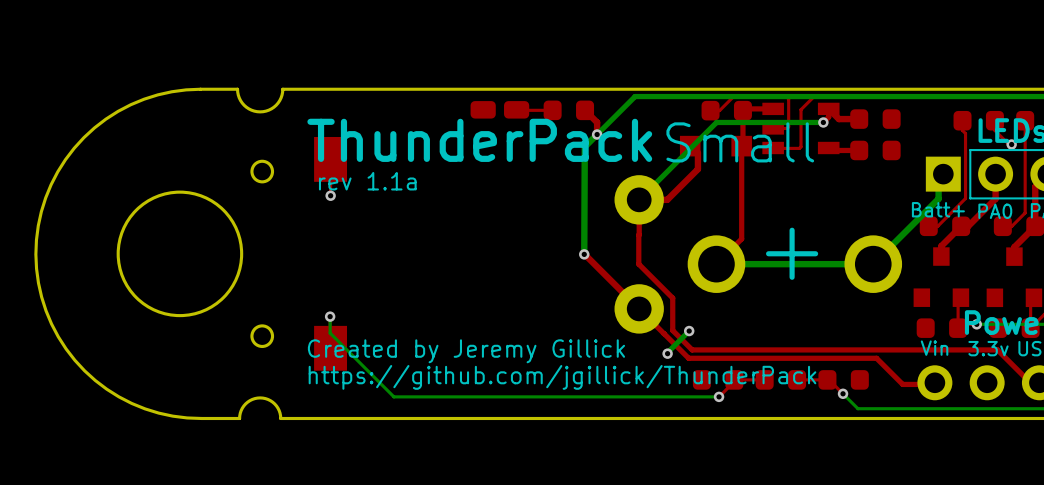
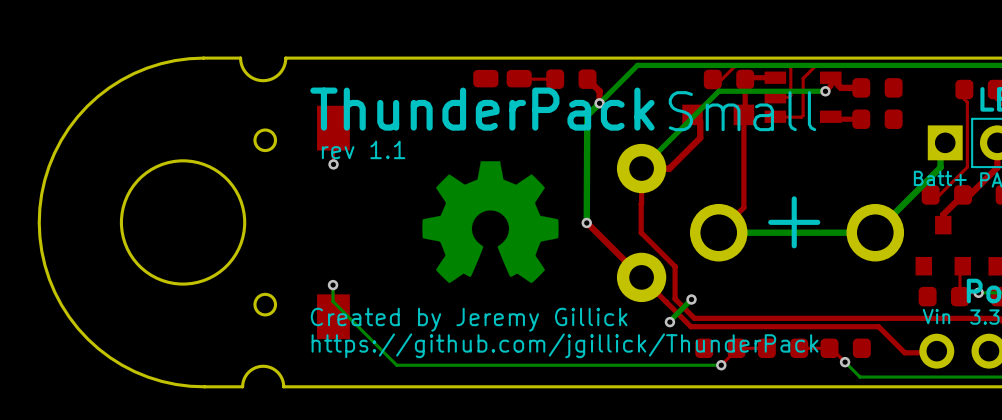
text: rev 1.1a (367, 181) -> rev 1.1 (363, 149)
drawing: none -> [422, 161, 559, 284]

